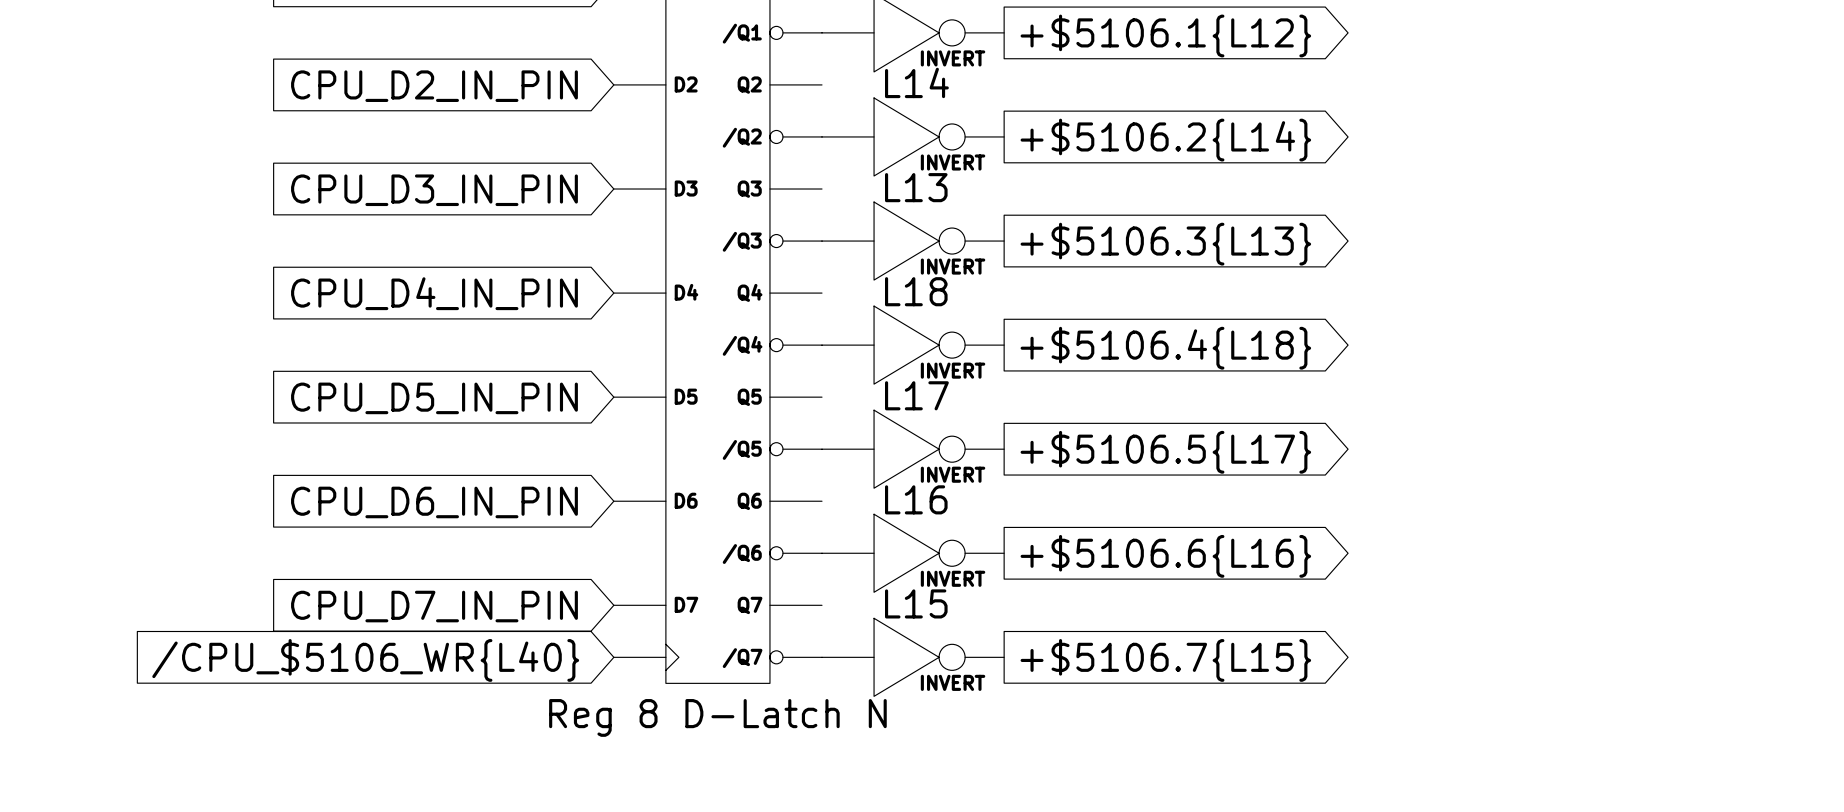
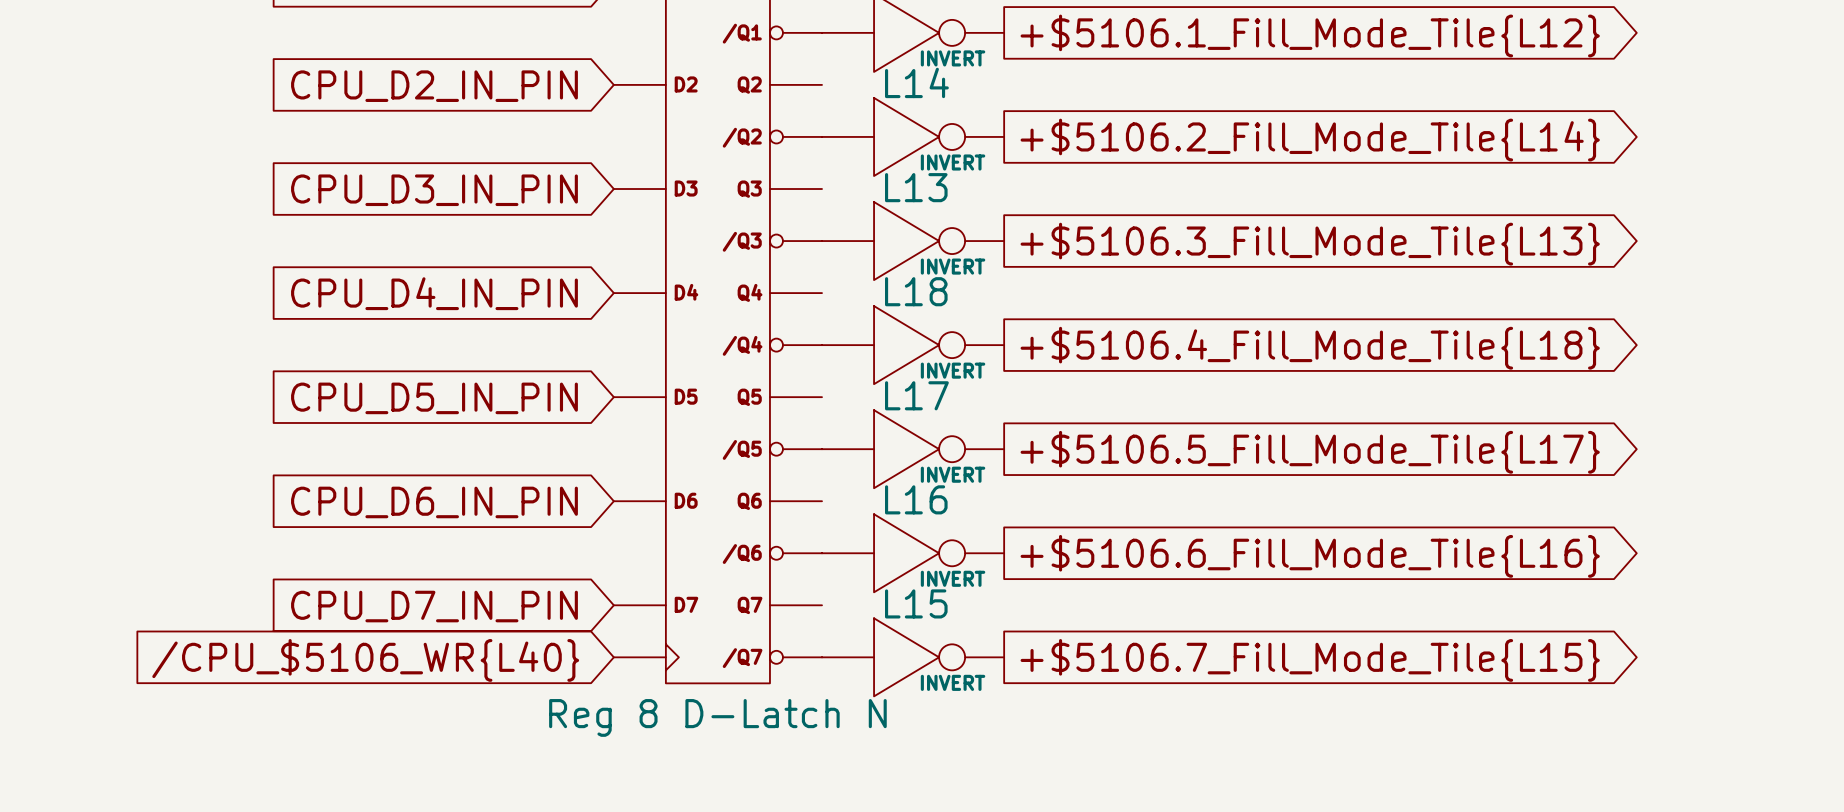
global label: +$5106.1{L12} (1165, 35) -> +$5106.1_Fill_Mode_Tile{L12} (1310, 35)
global label: +$5106.2{L14} (1165, 140) -> +$5106.2_Fill_Mode_Tile{L14} (1310, 140)
global label: +$5106.3{L13} (1165, 244) -> +$5106.3_Fill_Mode_Tile{L13} (1310, 244)
global label: +$5106.4{L18} (1165, 348) -> +$5106.4_Fill_Mode_Tile{L18} (1310, 348)
global label: +$5106.5{L17} (1165, 452) -> +$5106.5_Fill_Mode_Tile{L17} (1310, 452)
global label: +$5106.6{L16} (1165, 556) -> +$5106.6_Fill_Mode_Tile{L16} (1310, 556)
global label: +$5106.7{L15} (1165, 660) -> +$5106.7_Fill_Mode_Tile{L15} (1310, 660)

